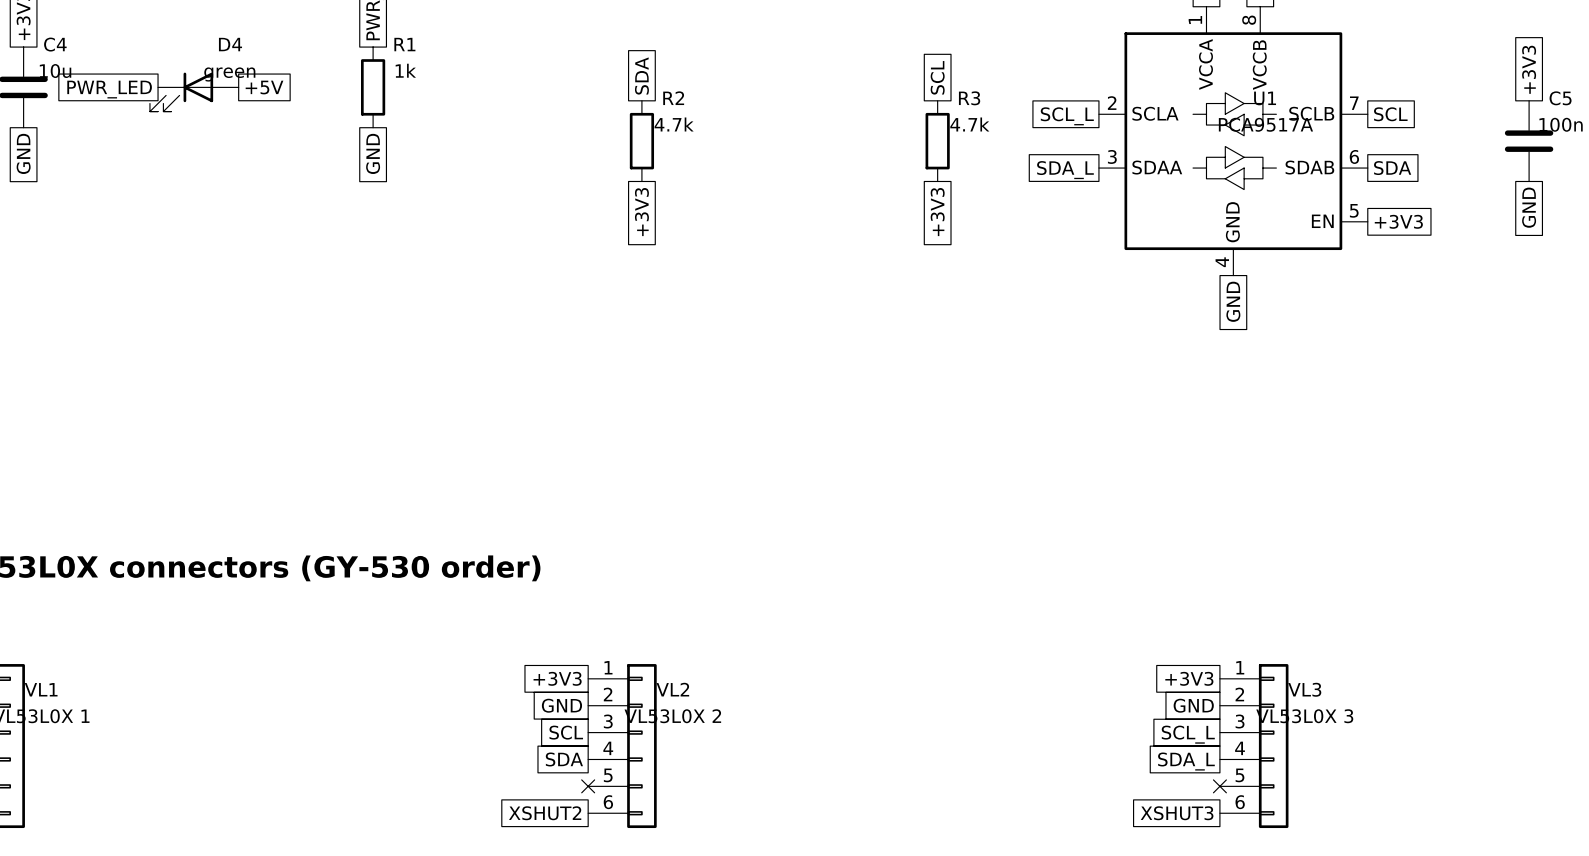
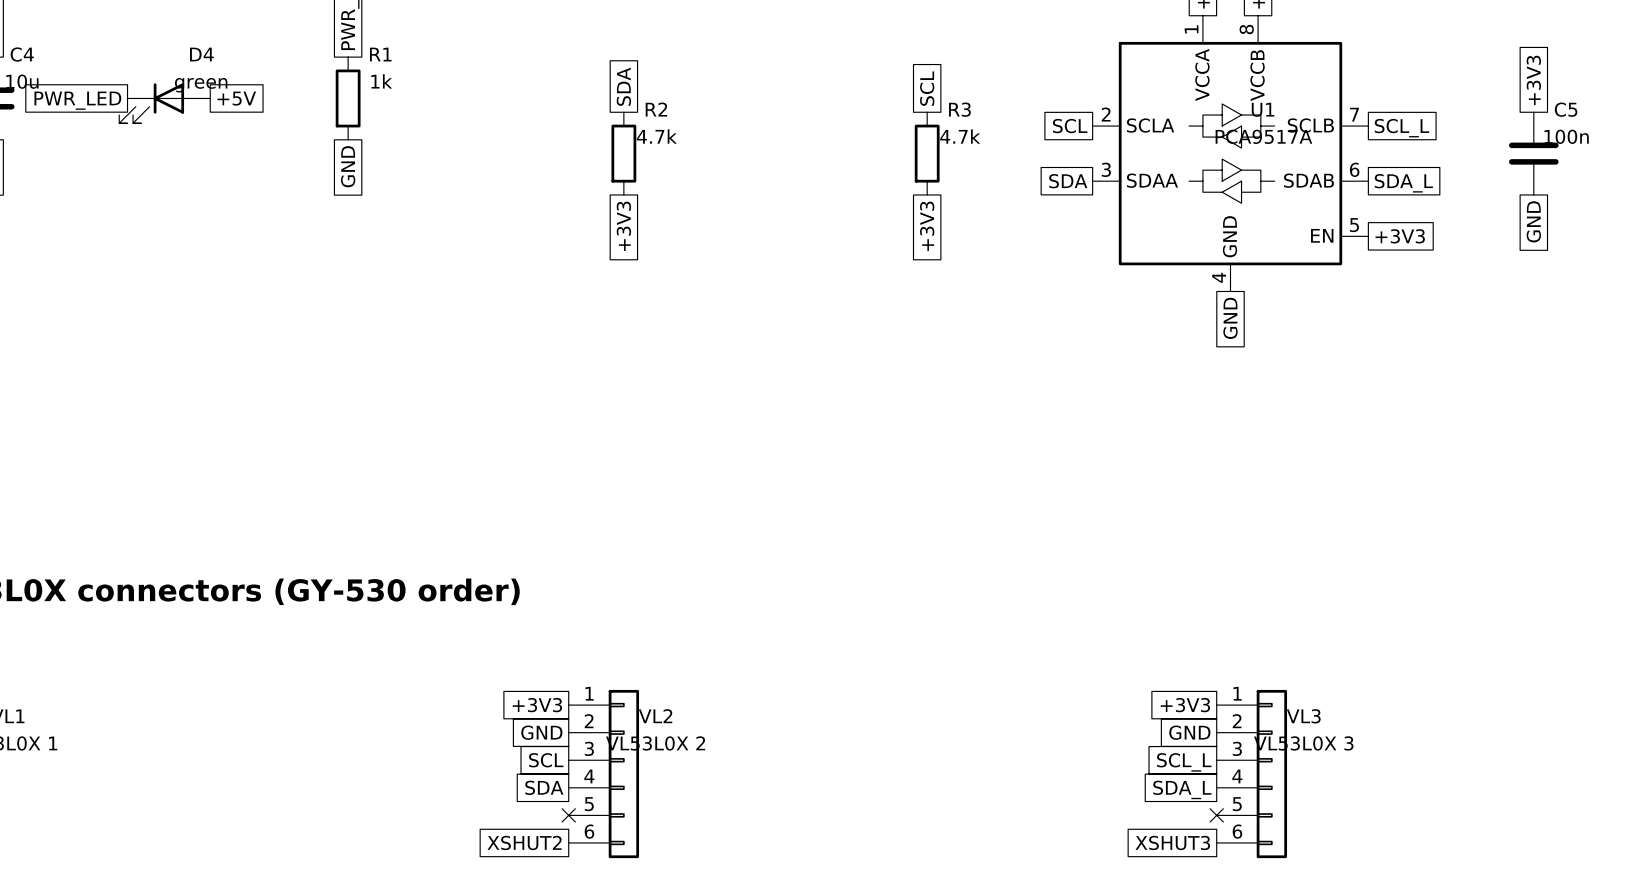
global label: SCL (1390, 114) -> SCL_L (1401, 128)
global label: SCL_L (1067, 116) -> SCL (1070, 126)
global label: SDA (1392, 168) -> SDA_L (1403, 183)
global label: SDA_L (1065, 170) -> SDA (1068, 181)

